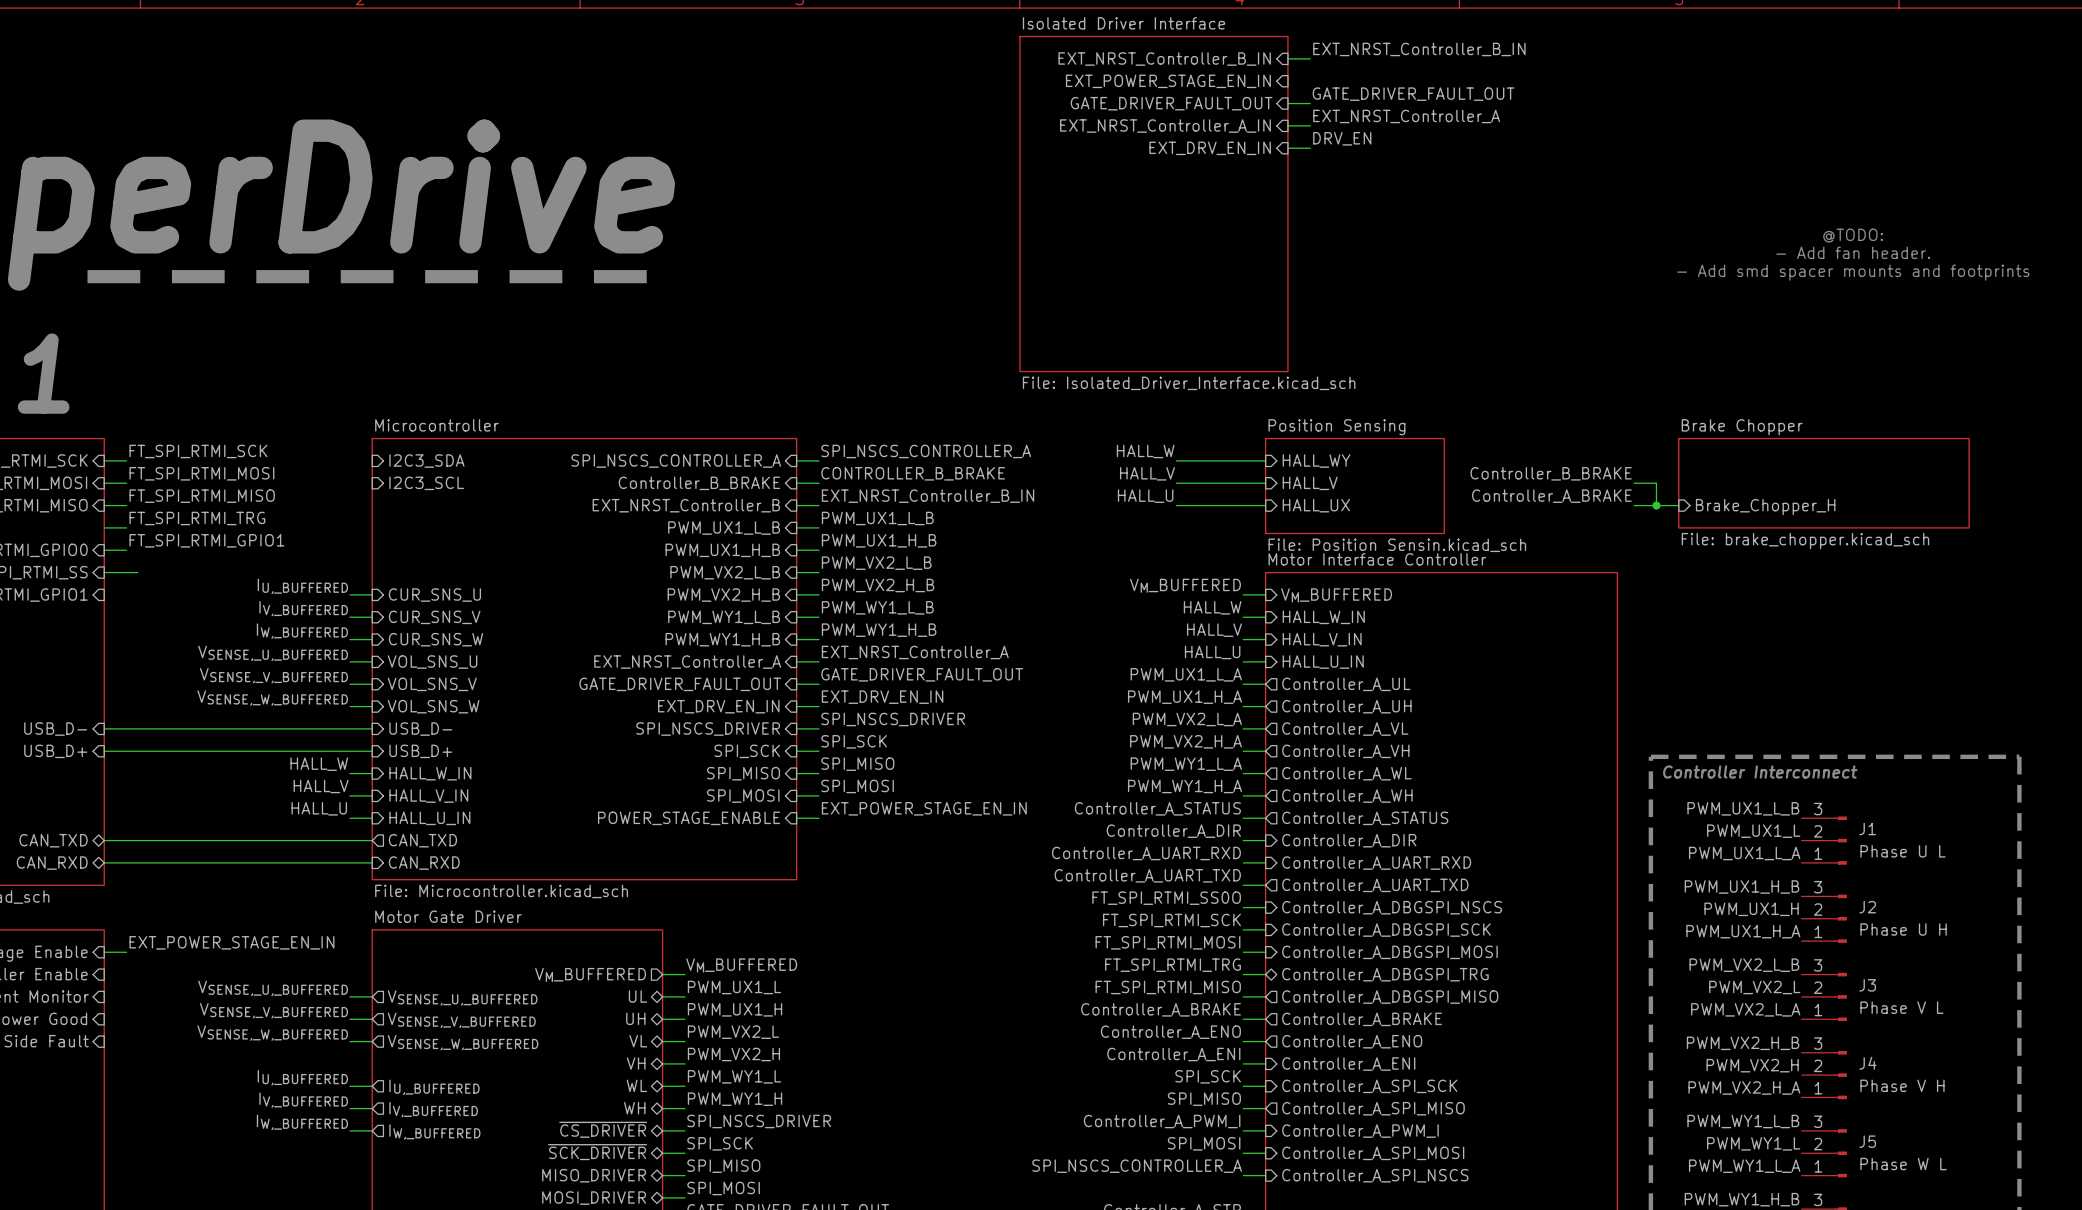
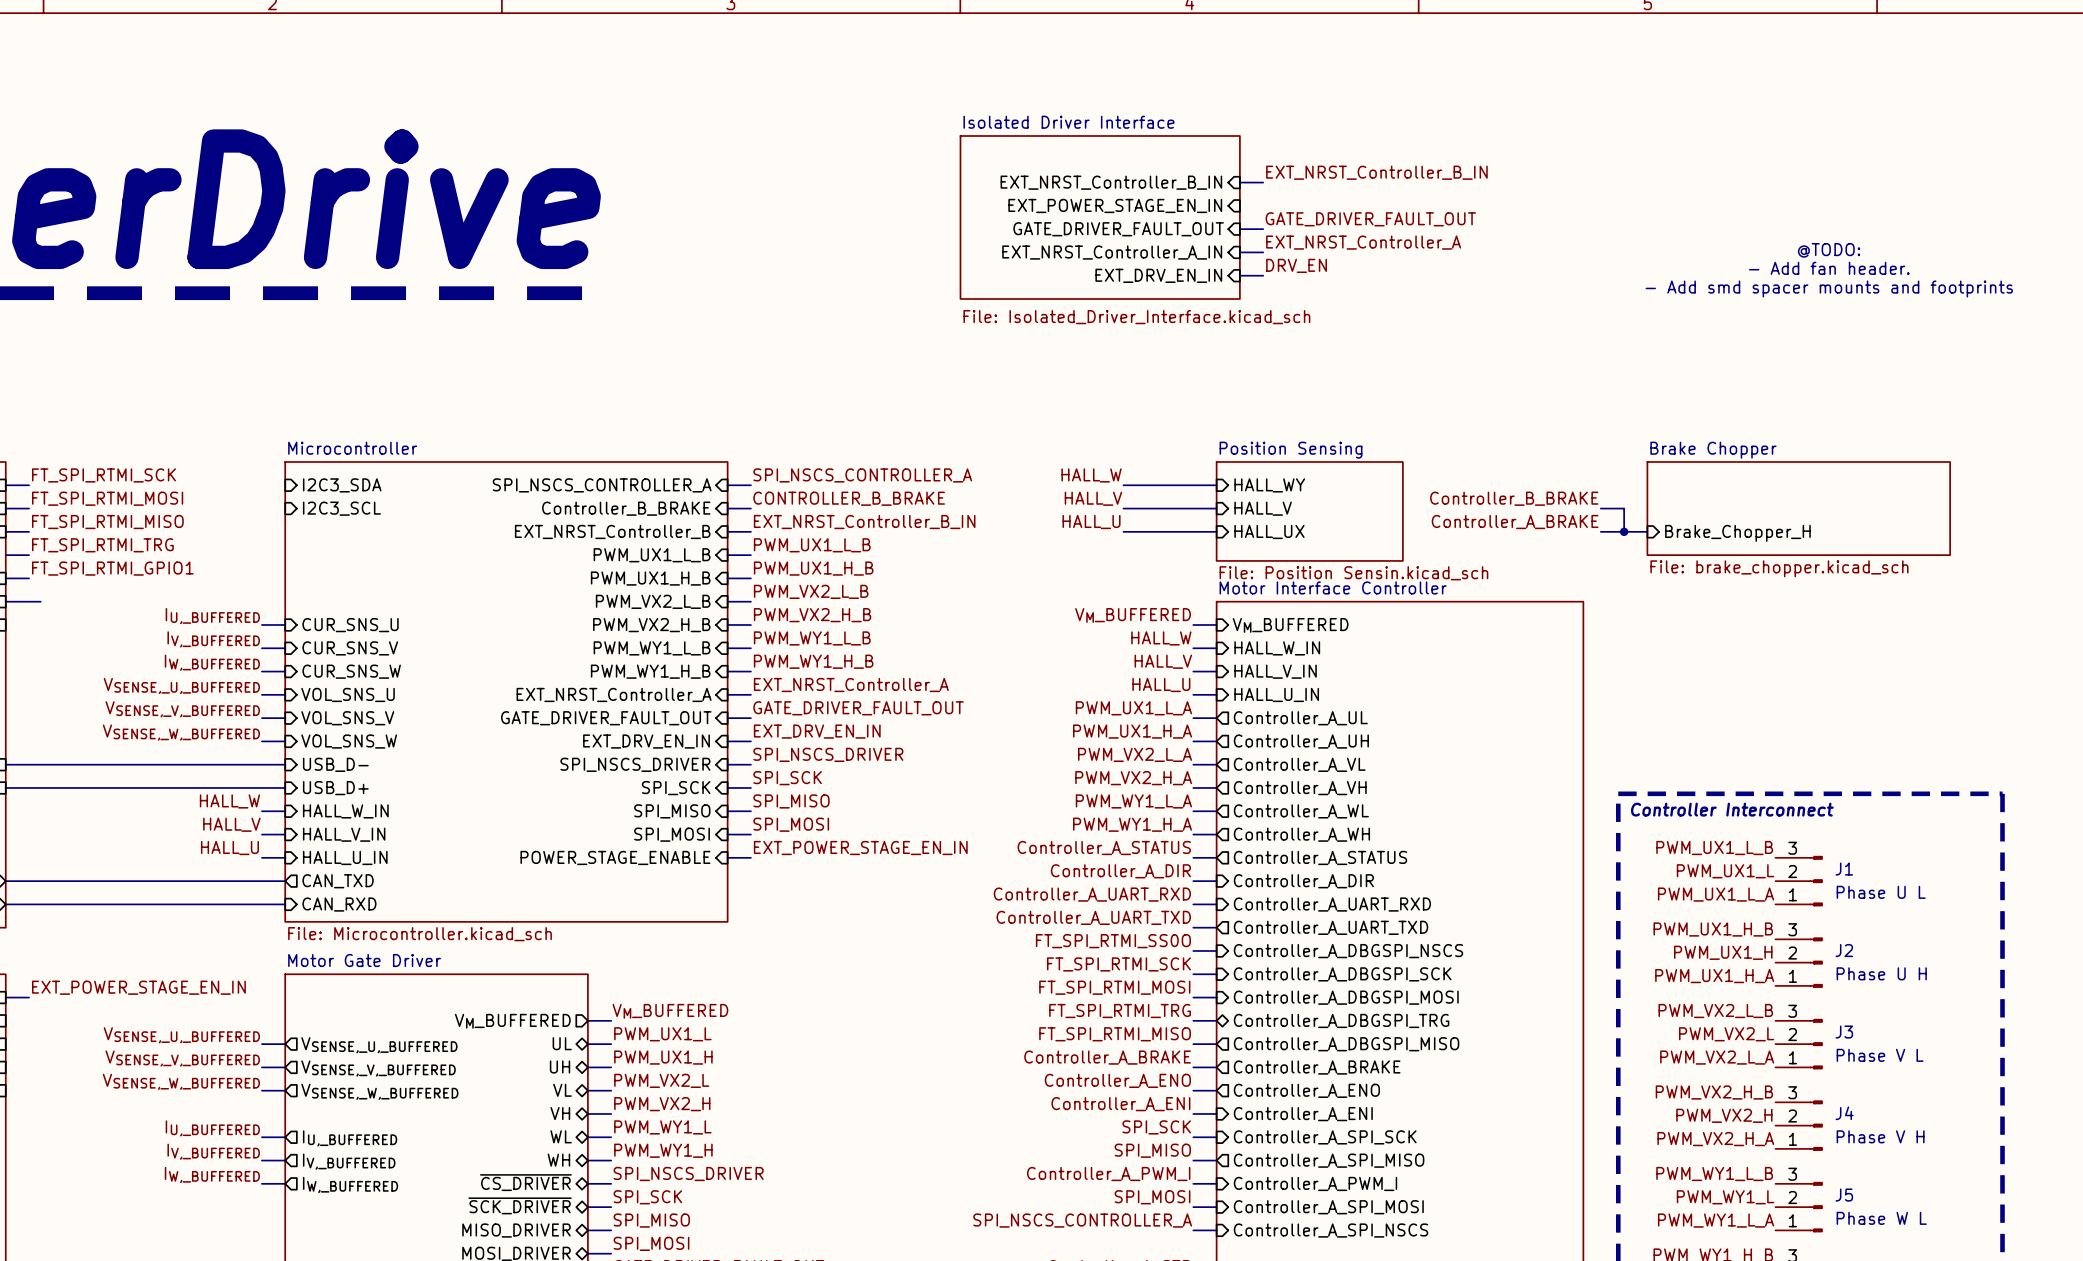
sheet Isolated Driver Interface name position: Isolated Driver Interface (1123, 23) -> Isolated Driver Interface (1068, 122)
sheet Isolated Driver Interface shape: [1019, 35, 1289, 373] -> [959, 135, 1241, 300]
label position: EXT_NRST_Controller_B_IN (1419, 49) -> EXT_NRST_Controller_B_IN (1376, 172)
wire: (1287, 58) (1310, 58) -> (1239, 182) (1263, 182)
sheet pin position: EXT_NRST_Controller_B_IN (1164, 59) -> EXT_NRST_Controller_B_IN (1111, 182)
sheet pin position: EXT_POWER_STAGE_EN_IN (1168, 81) -> EXT_POWER_STAGE_EN_IN (1115, 205)
label position: GATE_DRIVER_FAULT_OUT (1413, 94) -> GATE_DRIVER_FAULT_OUT (1370, 219)
sheet pin position: GATE_DRIVER_FAULT_OUT (1171, 103) -> GATE_DRIVER_FAULT_OUT (1118, 229)
wire: (1287, 103) (1310, 103) -> (1239, 229) (1263, 229)
label position: EXT_NRST_Controller_A (1406, 116) -> EXT_NRST_Controller_A (1363, 242)
wire: (1287, 125) (1310, 125) -> (1239, 252) (1263, 252)
sheet pin position: EXT_NRST_Controller_A_IN (1165, 126) -> EXT_NRST_Controller_A_IN (1112, 252)
label position: DRV_EN (1342, 138) -> DRV_EN (1296, 265)
sheet pin position: EXT_DRV_EN_IN (1210, 148) -> EXT_DRV_EN_IN (1158, 275)
wire: (1287, 148) (1310, 148) -> (1239, 275) (1263, 275)
sheet Isolated Driver Interface value position: File: Isolated_Driver_Interface.kicad_sch (1189, 383) -> File: Isolated_Driver_Interface.kicad_sch (1136, 317)

